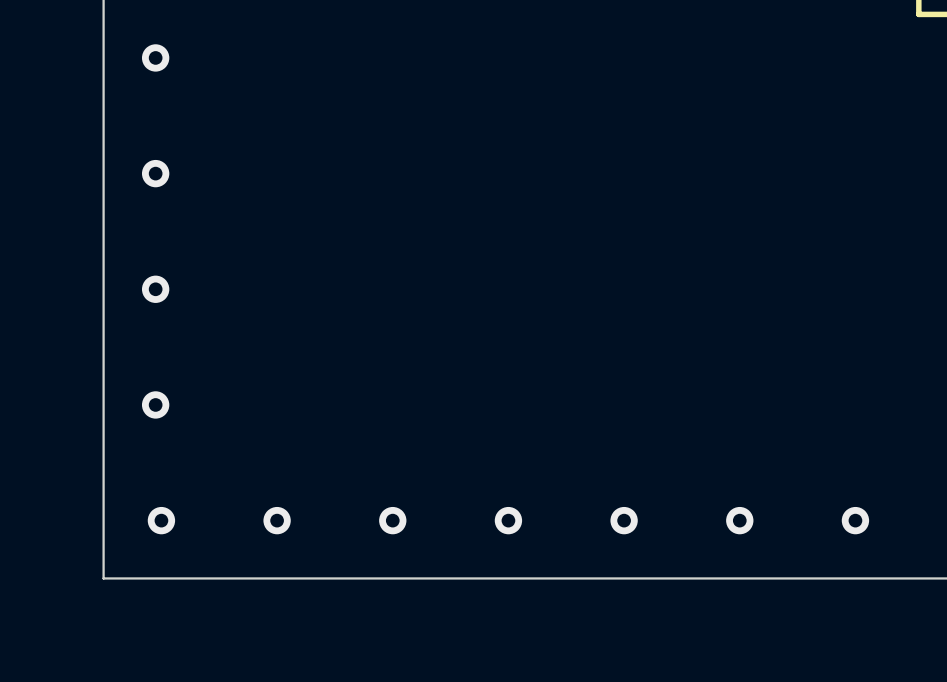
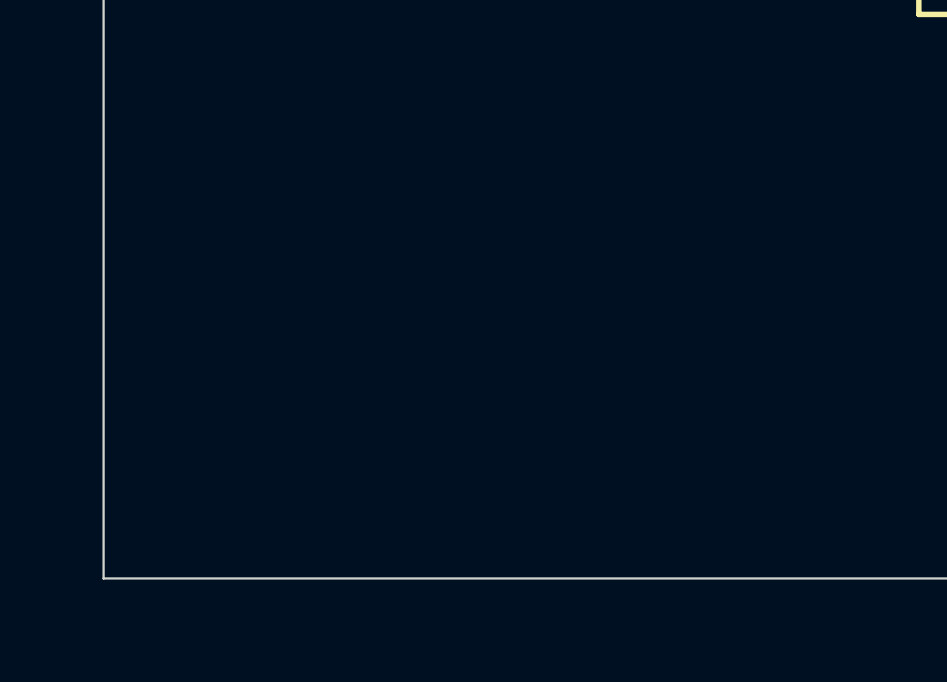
via: (155, 57) -> none
via: (155, 173) -> none
via: (155, 289) -> none
via: (155, 404) -> none
via: (161, 520) -> none
via: (277, 520) -> none
via: (392, 520) -> none
via: (508, 520) -> none
via: (624, 520) -> none
via: (739, 520) -> none
via: (855, 520) -> none

